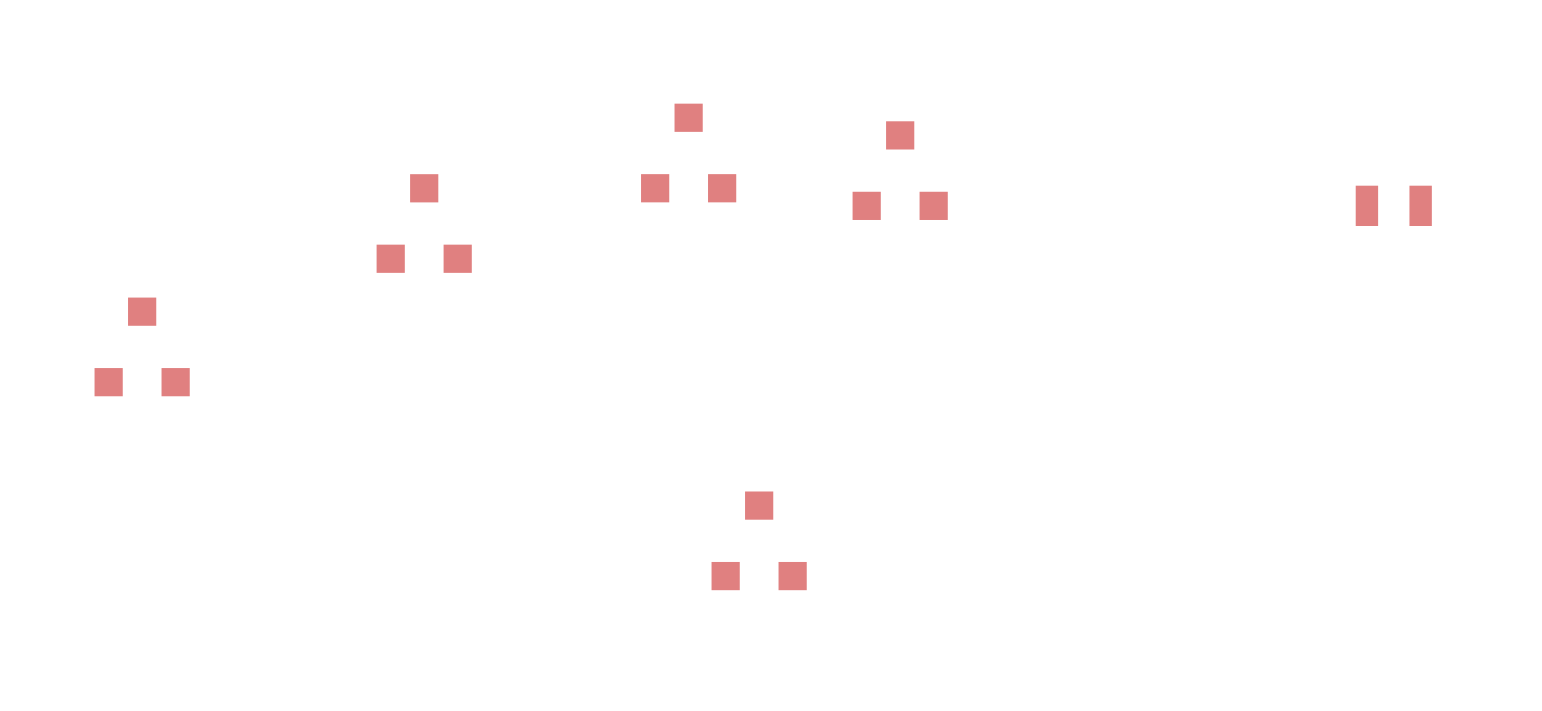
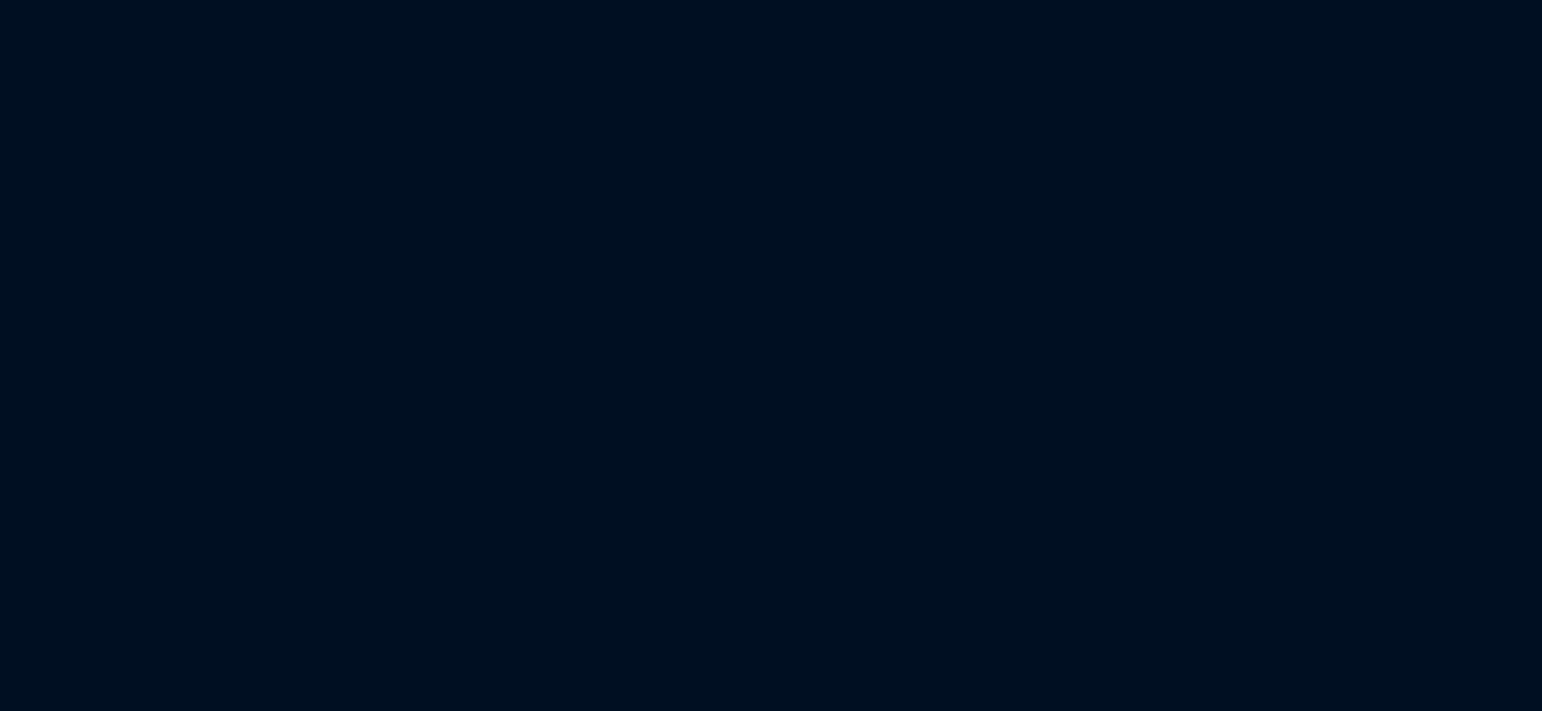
part: (688, 153) -> none
part: (900, 170) -> none
part: (1393, 205) -> none
part: (424, 223) -> none
part: (142, 346) -> none
part: (759, 540) -> none

